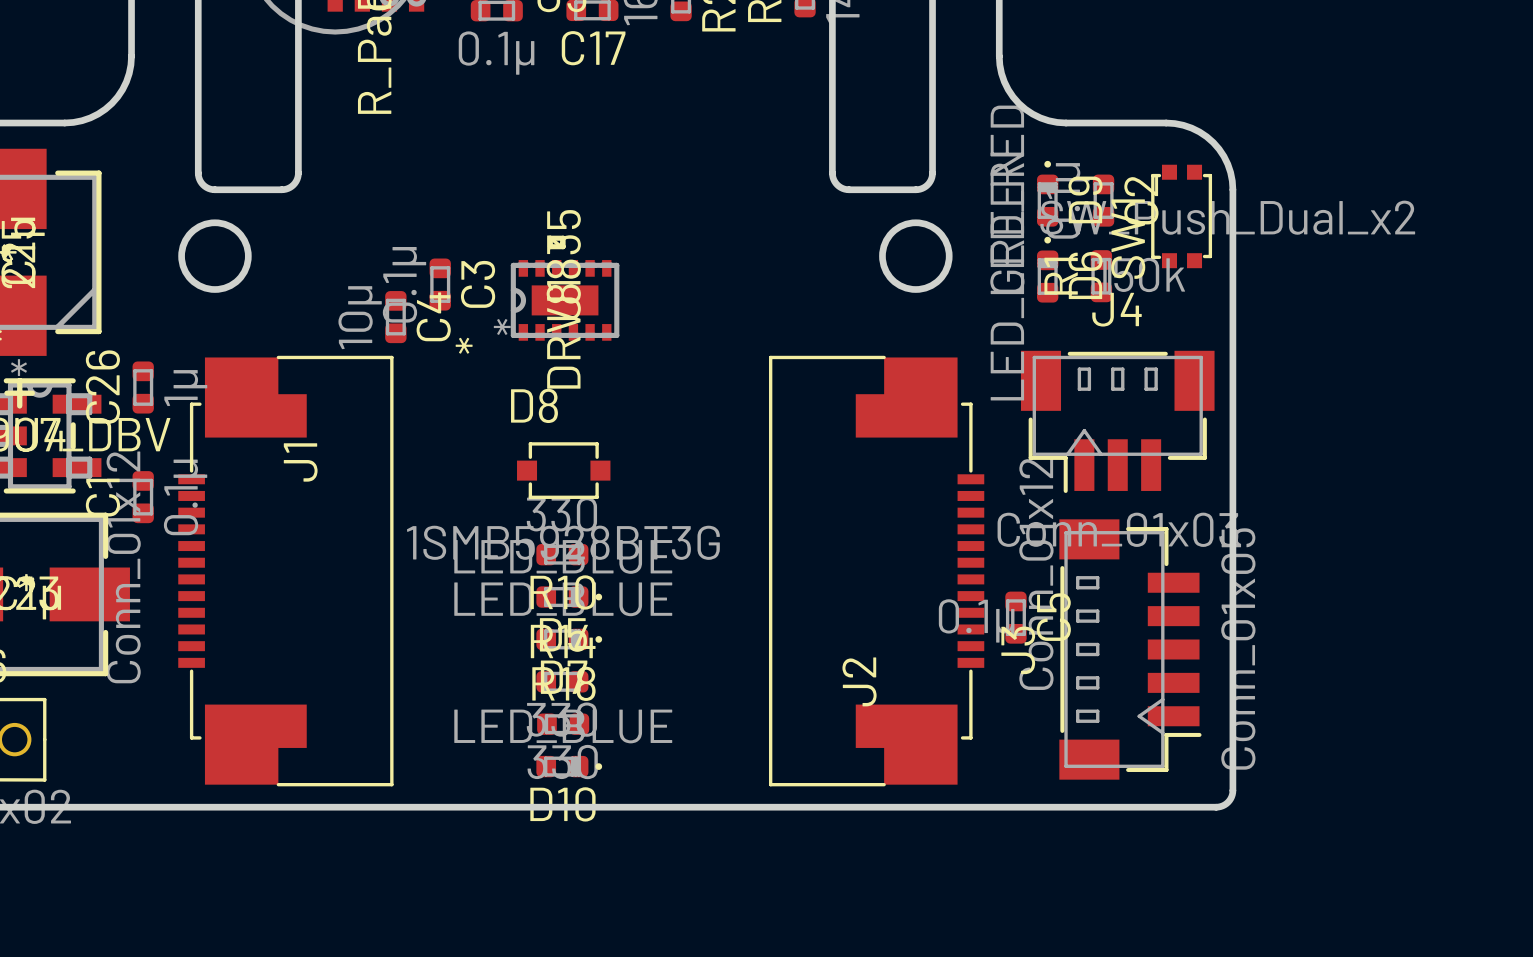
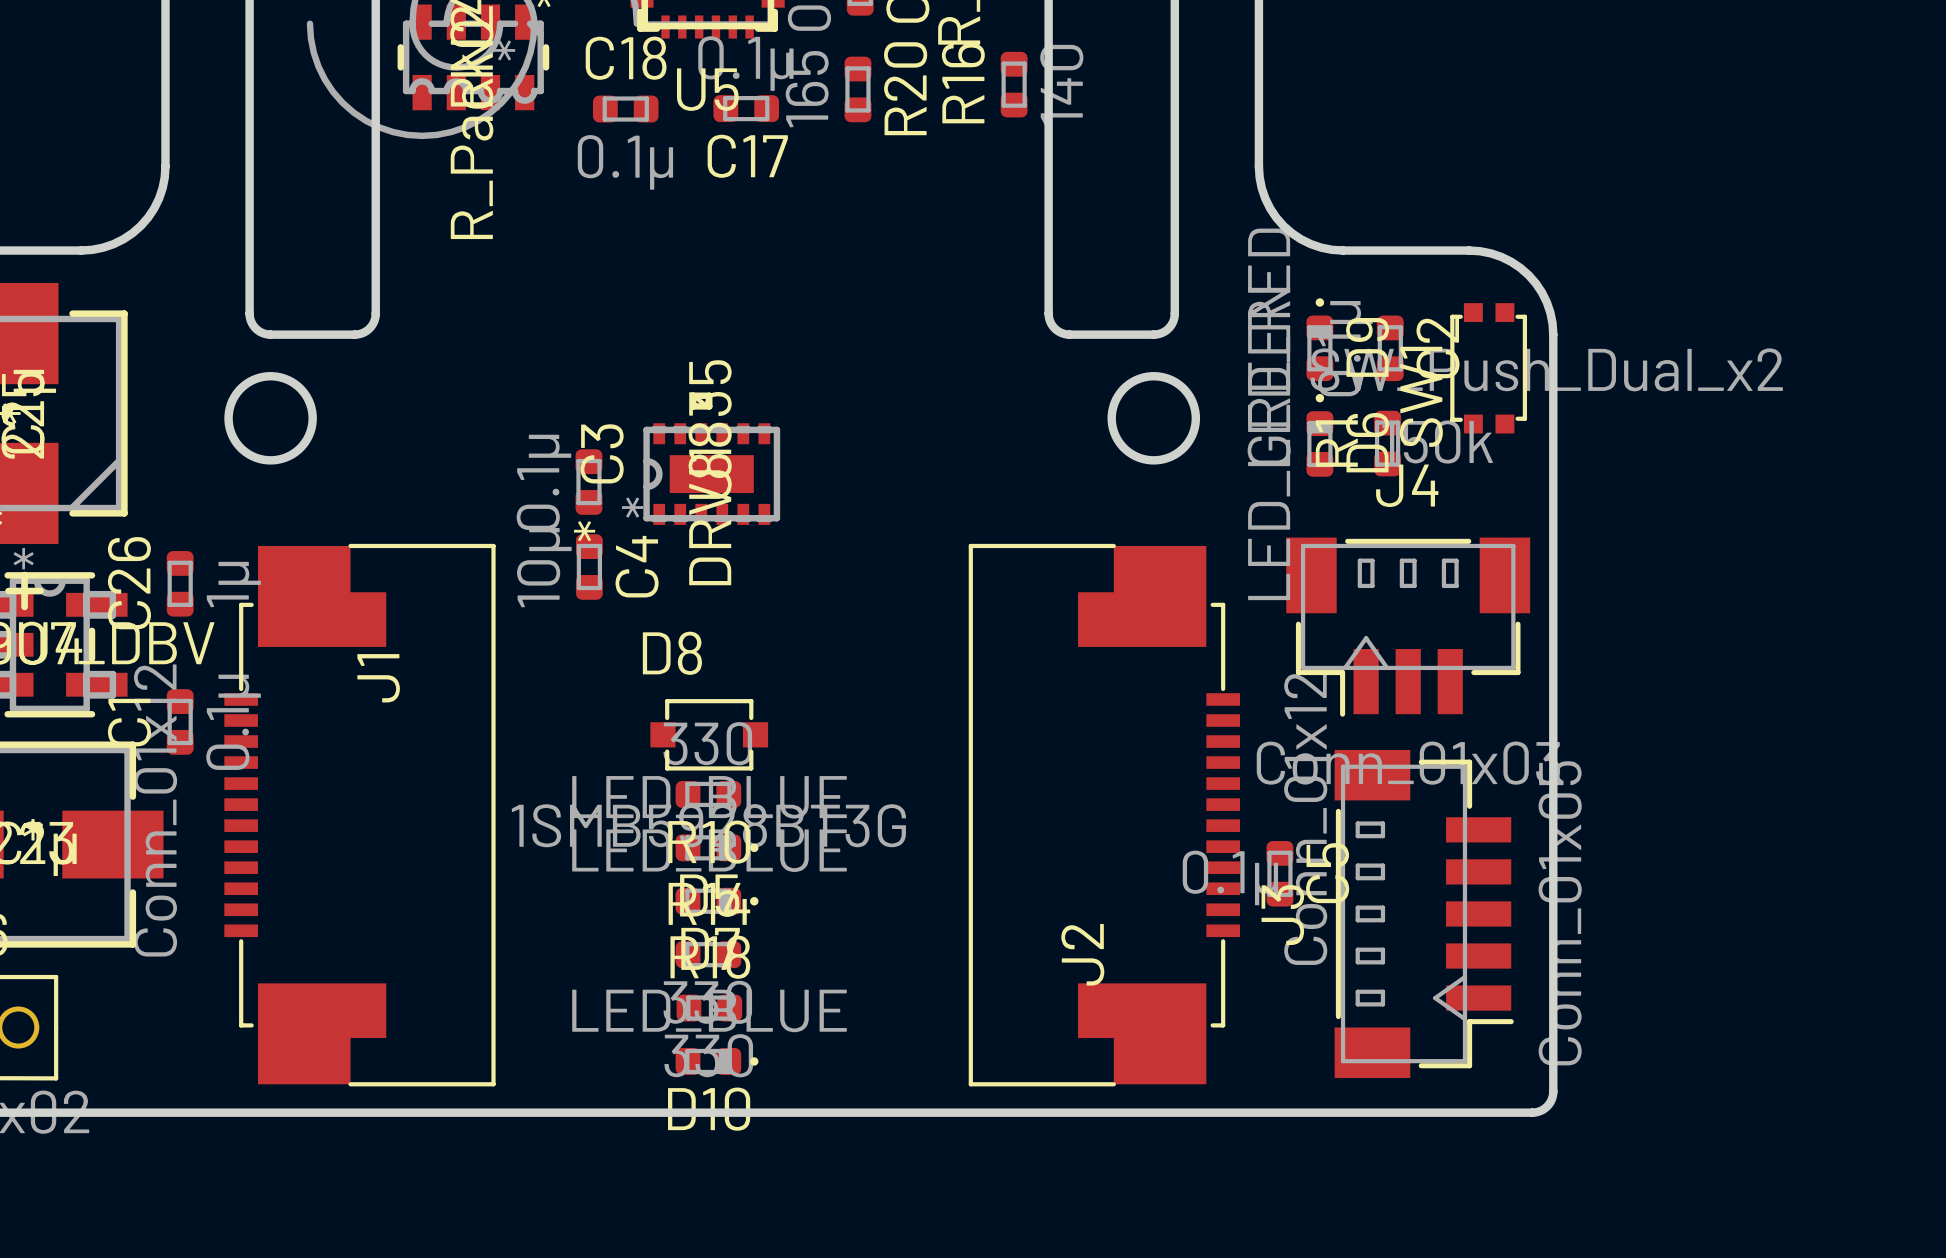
C3 position: (440, 284) -> (588, 482)
C4 position: (395, 317) -> (589, 567)
D8 position: (563, 470) -> (709, 734)

